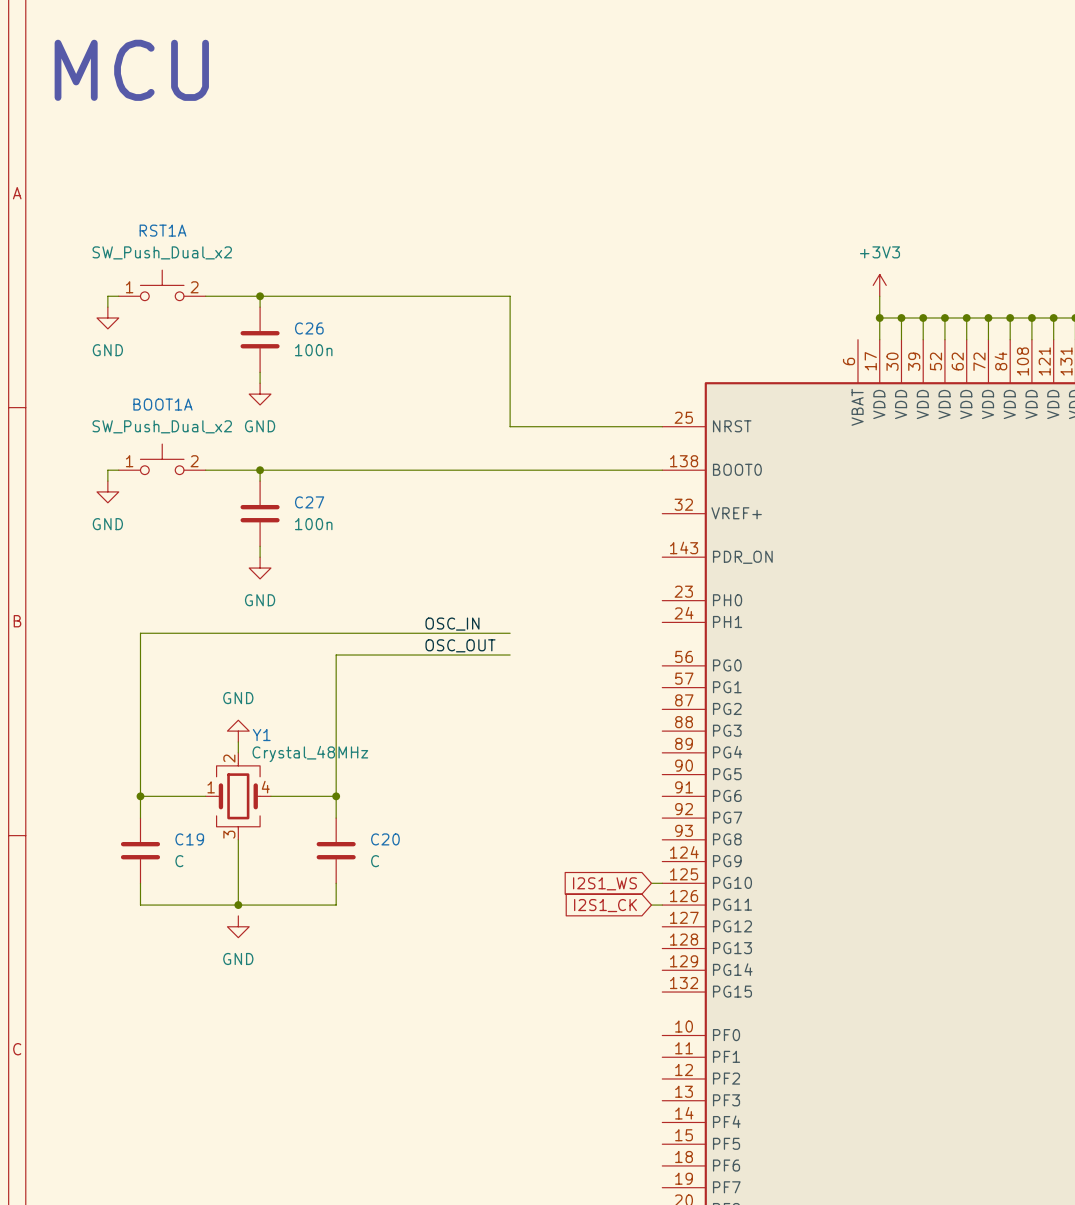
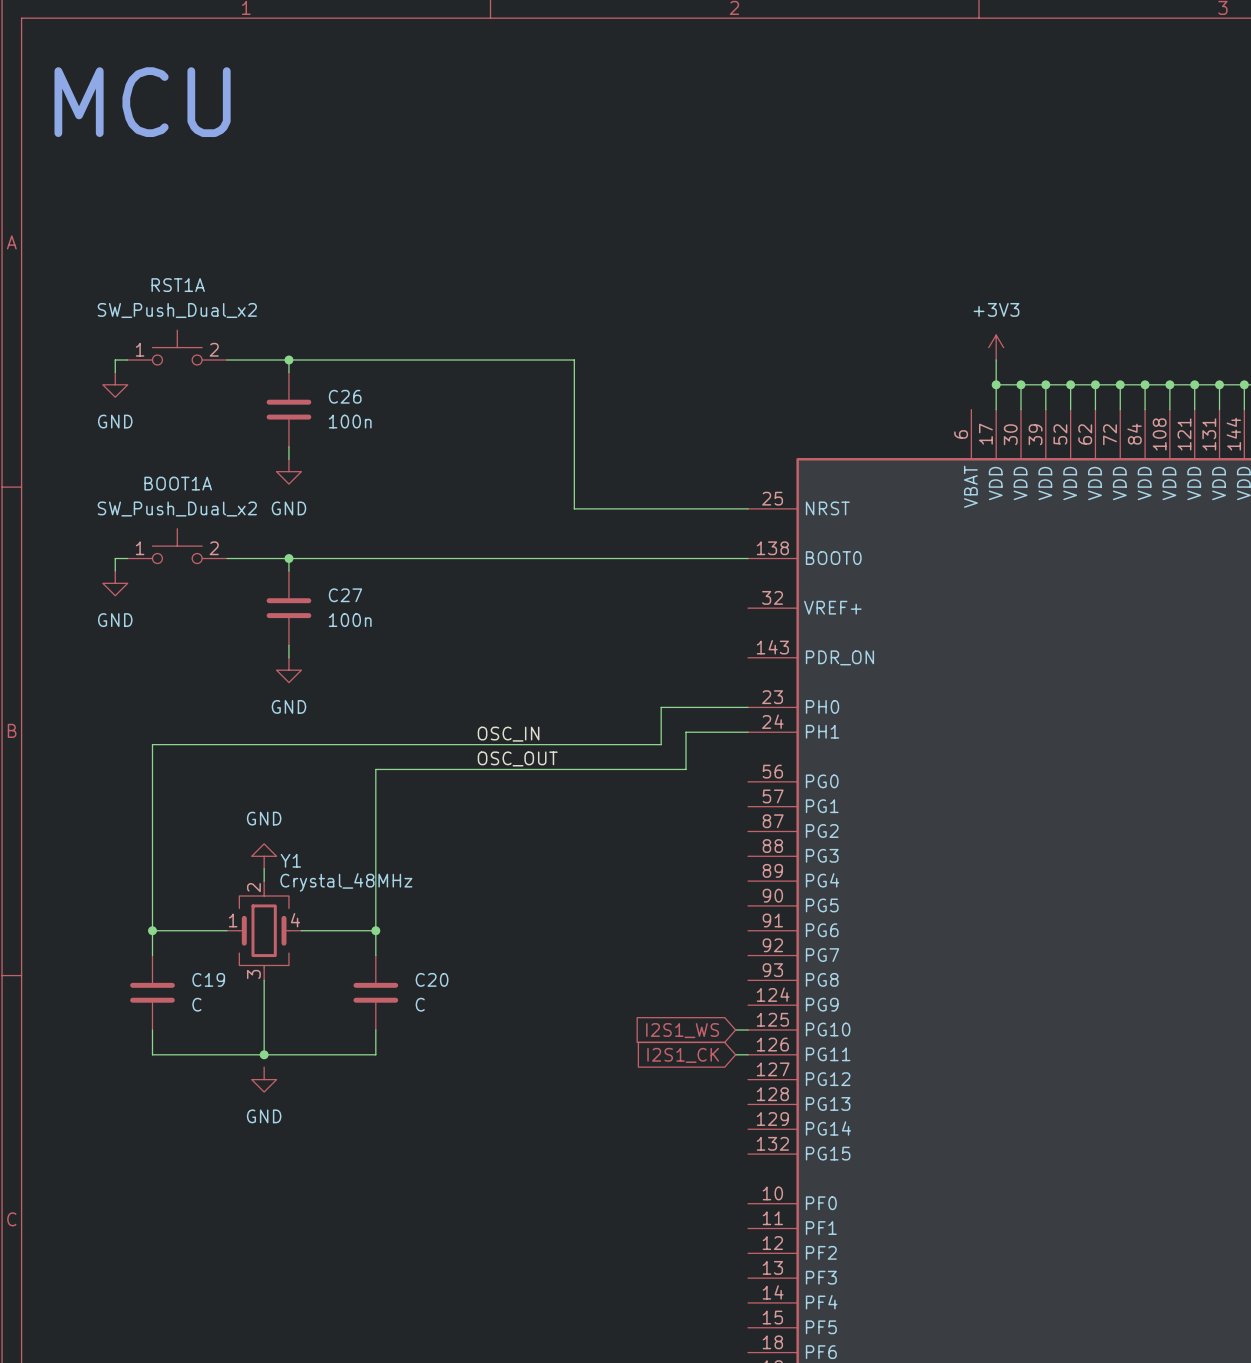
wire: none -> (748, 707) (661, 707) (661, 744) (574, 744)
wire: none -> (748, 732) (686, 732) (686, 769) (574, 769)

